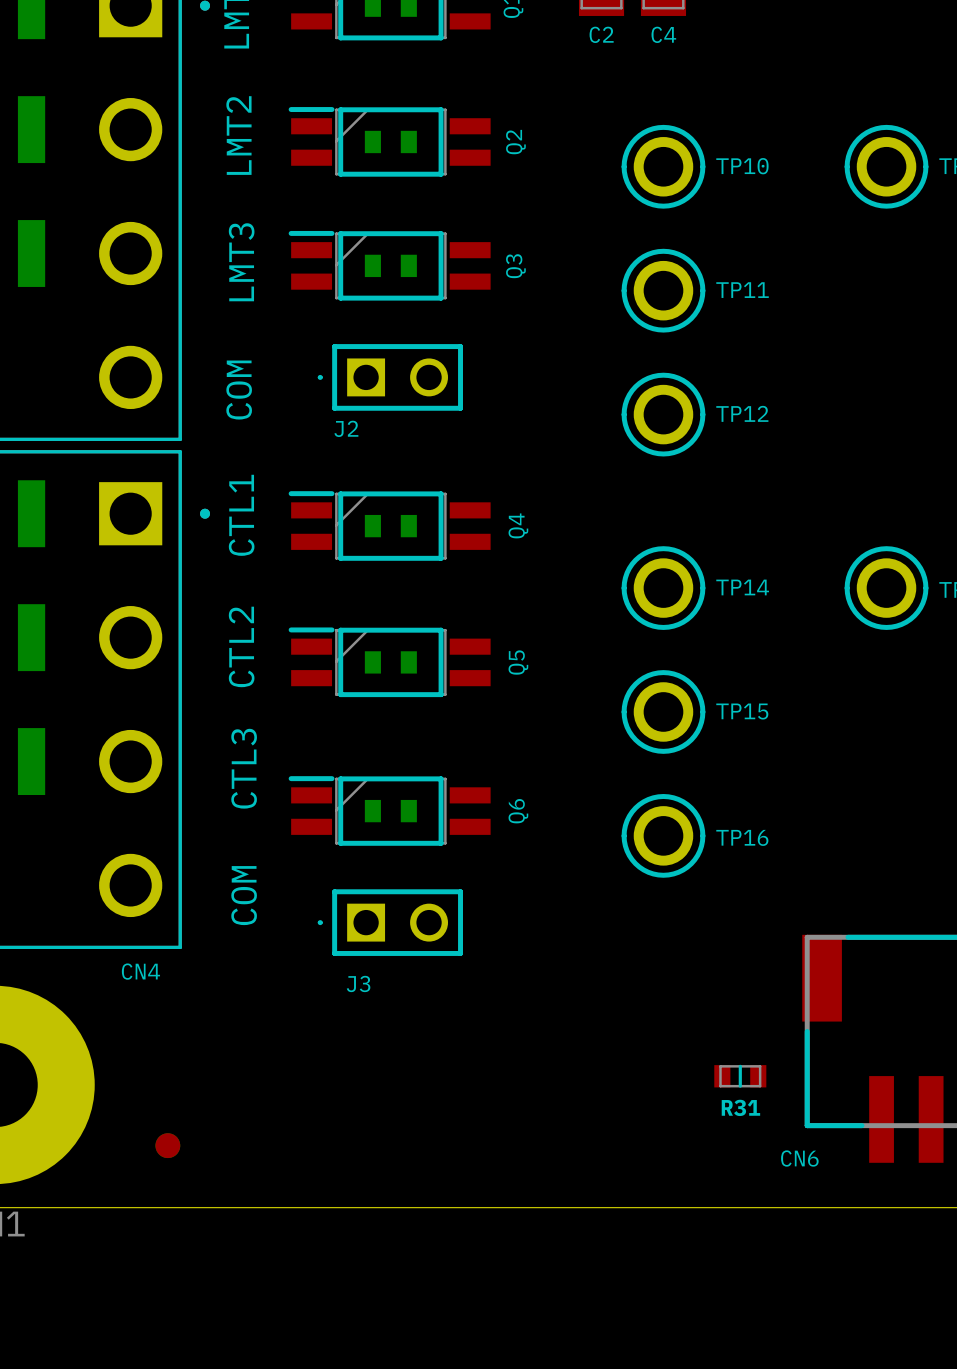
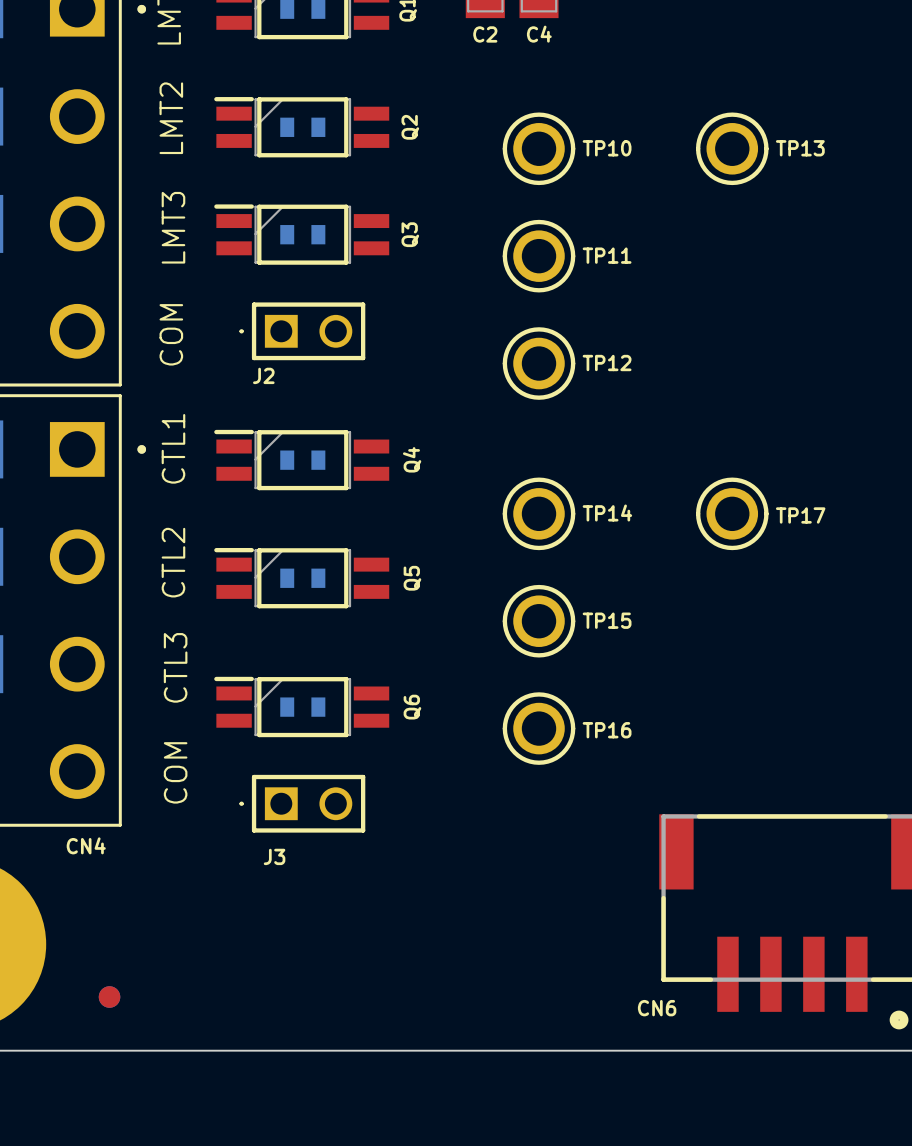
R31: (740, 1076) -> none

